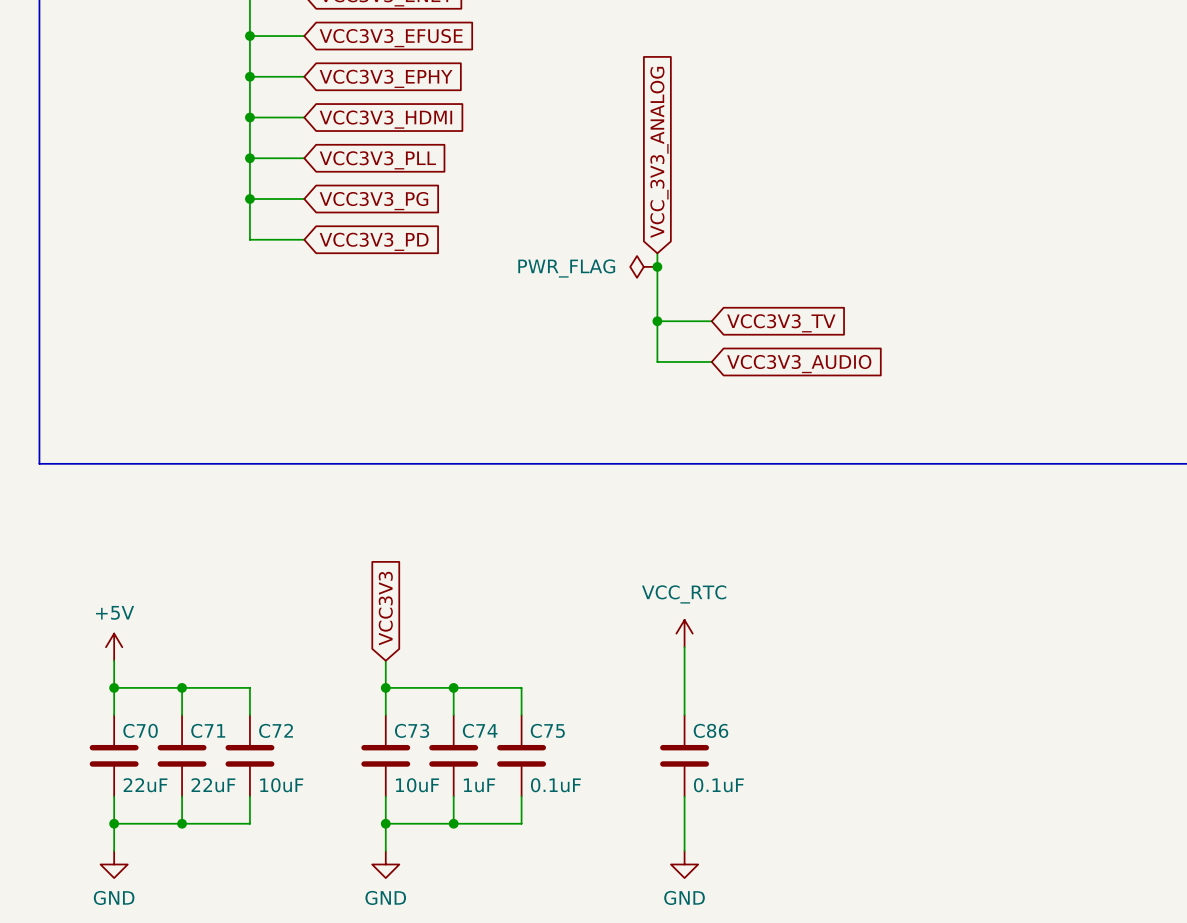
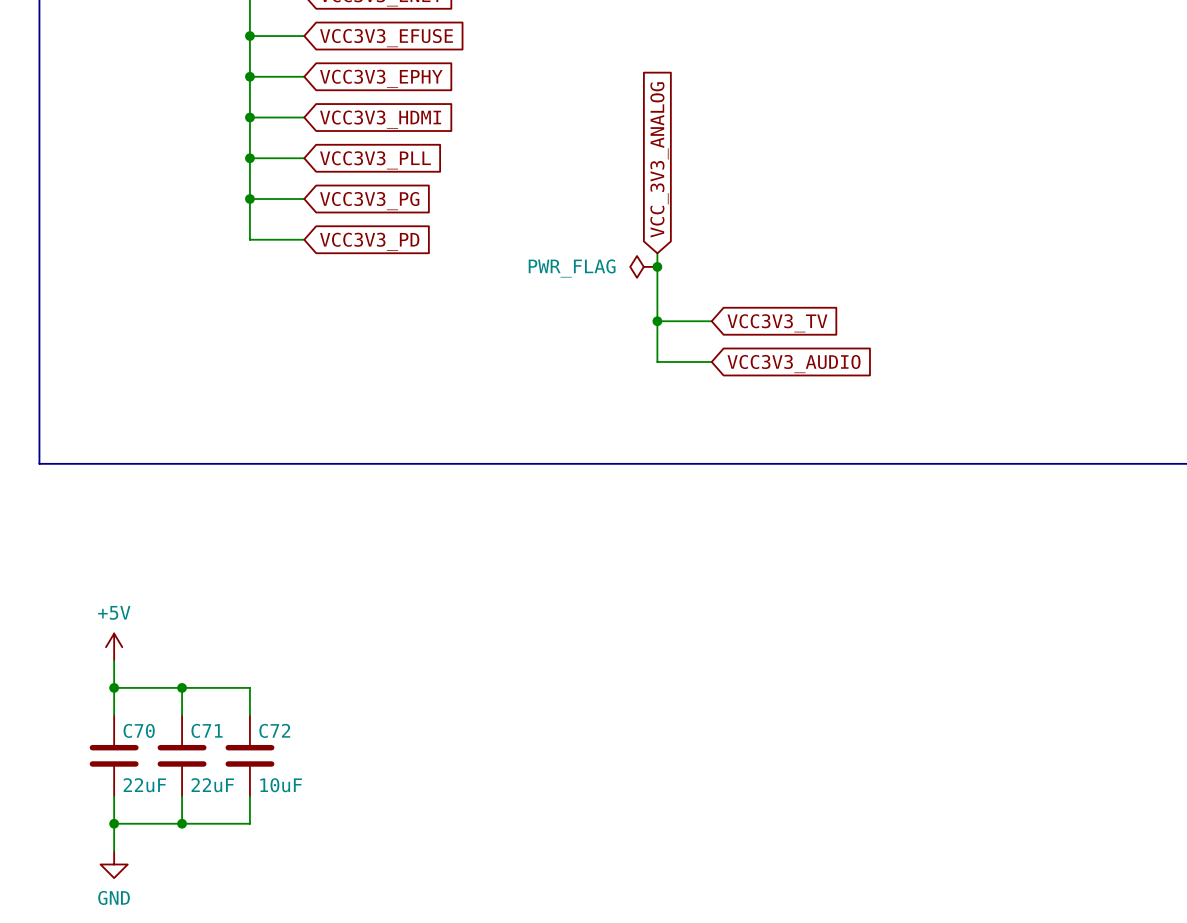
global label: VCC3V3 (385, 608) -> none
power symbol: VCC_RTC (684, 633) -> none
wire: (684, 647) (684, 715) -> none
wire: (385, 660) (385, 715) -> none
wire: (385, 687) (521, 687) (521, 715) -> none
junction: (385, 687) -> none
wire: (453, 687) (453, 715) -> none
junction: (453, 687) -> none
C73: 10uF (385, 755) -> none
C74: 1uF (453, 755) -> none
C75: 0.1uF (521, 755) -> none
C86: 0.1uF (684, 755) -> none
wire: (385, 796) (385, 850) -> none
wire: (453, 796) (453, 823) -> none
wire: (521, 796) (521, 823) (385, 823) -> none
wire: (684, 796) (684, 850) -> none
junction: (385, 823) -> none
junction: (453, 823) -> none
power symbol: GND (385, 864) -> none
power symbol: GND (684, 864) -> none

